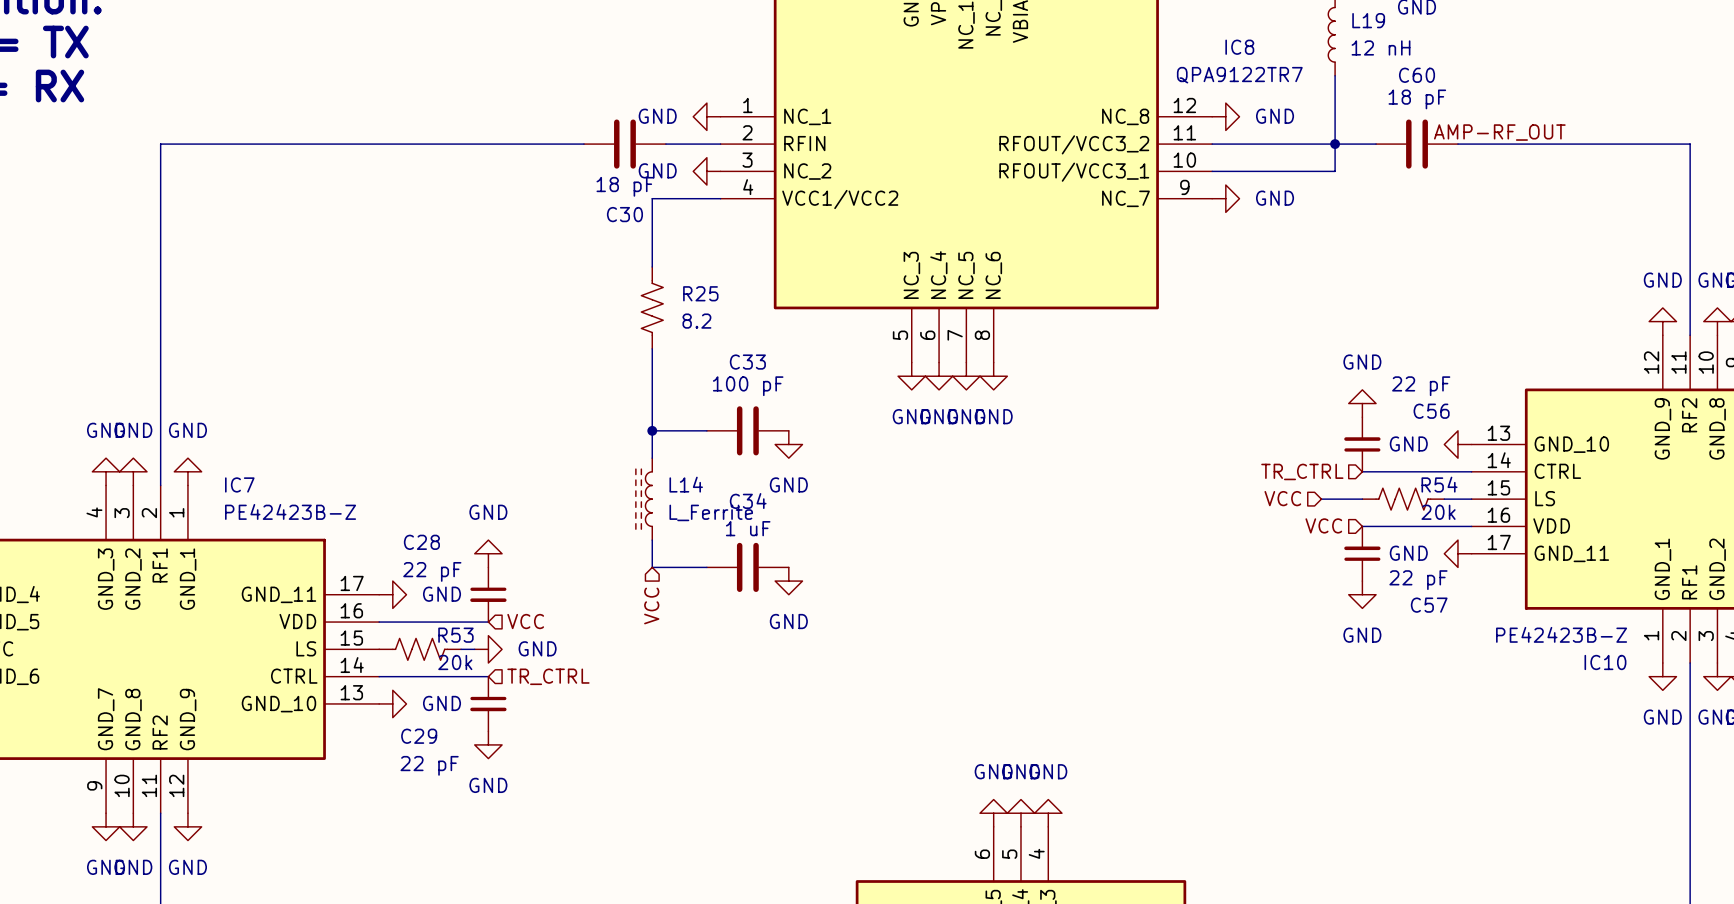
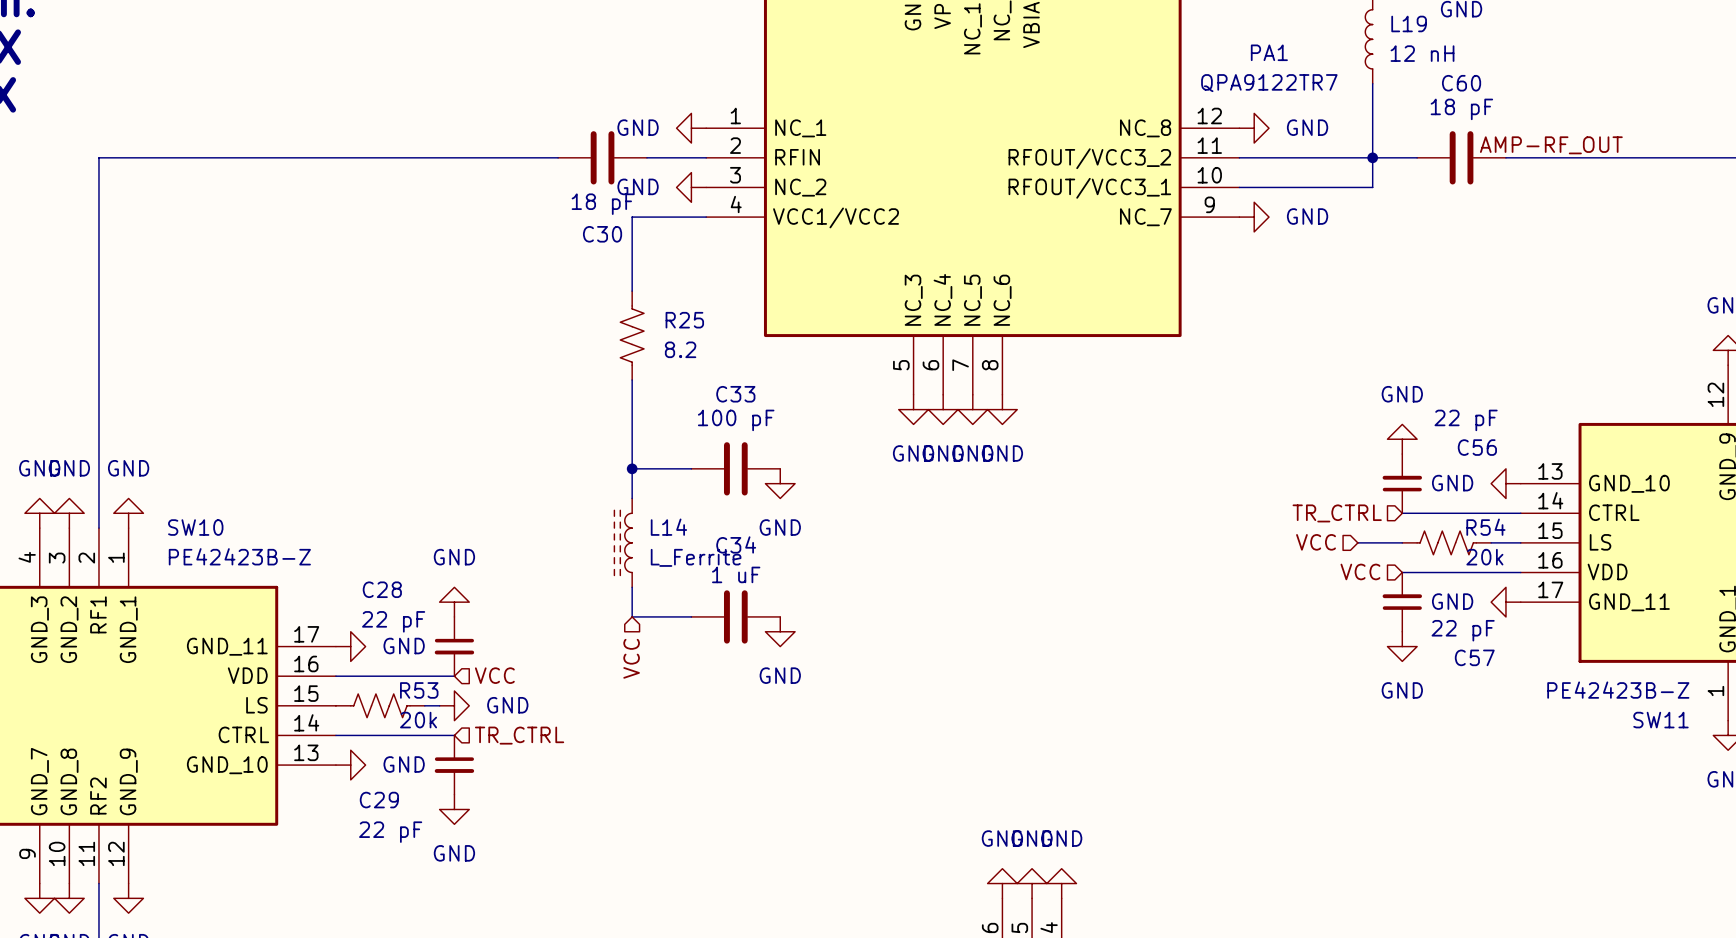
IC8 name: IC8 (1239, 47) -> PA1 (1269, 52)
IC7 name: IC7 (239, 484) -> SW10 (195, 527)
IC10 name: IC10 (1605, 662) -> SW11 (1660, 720)

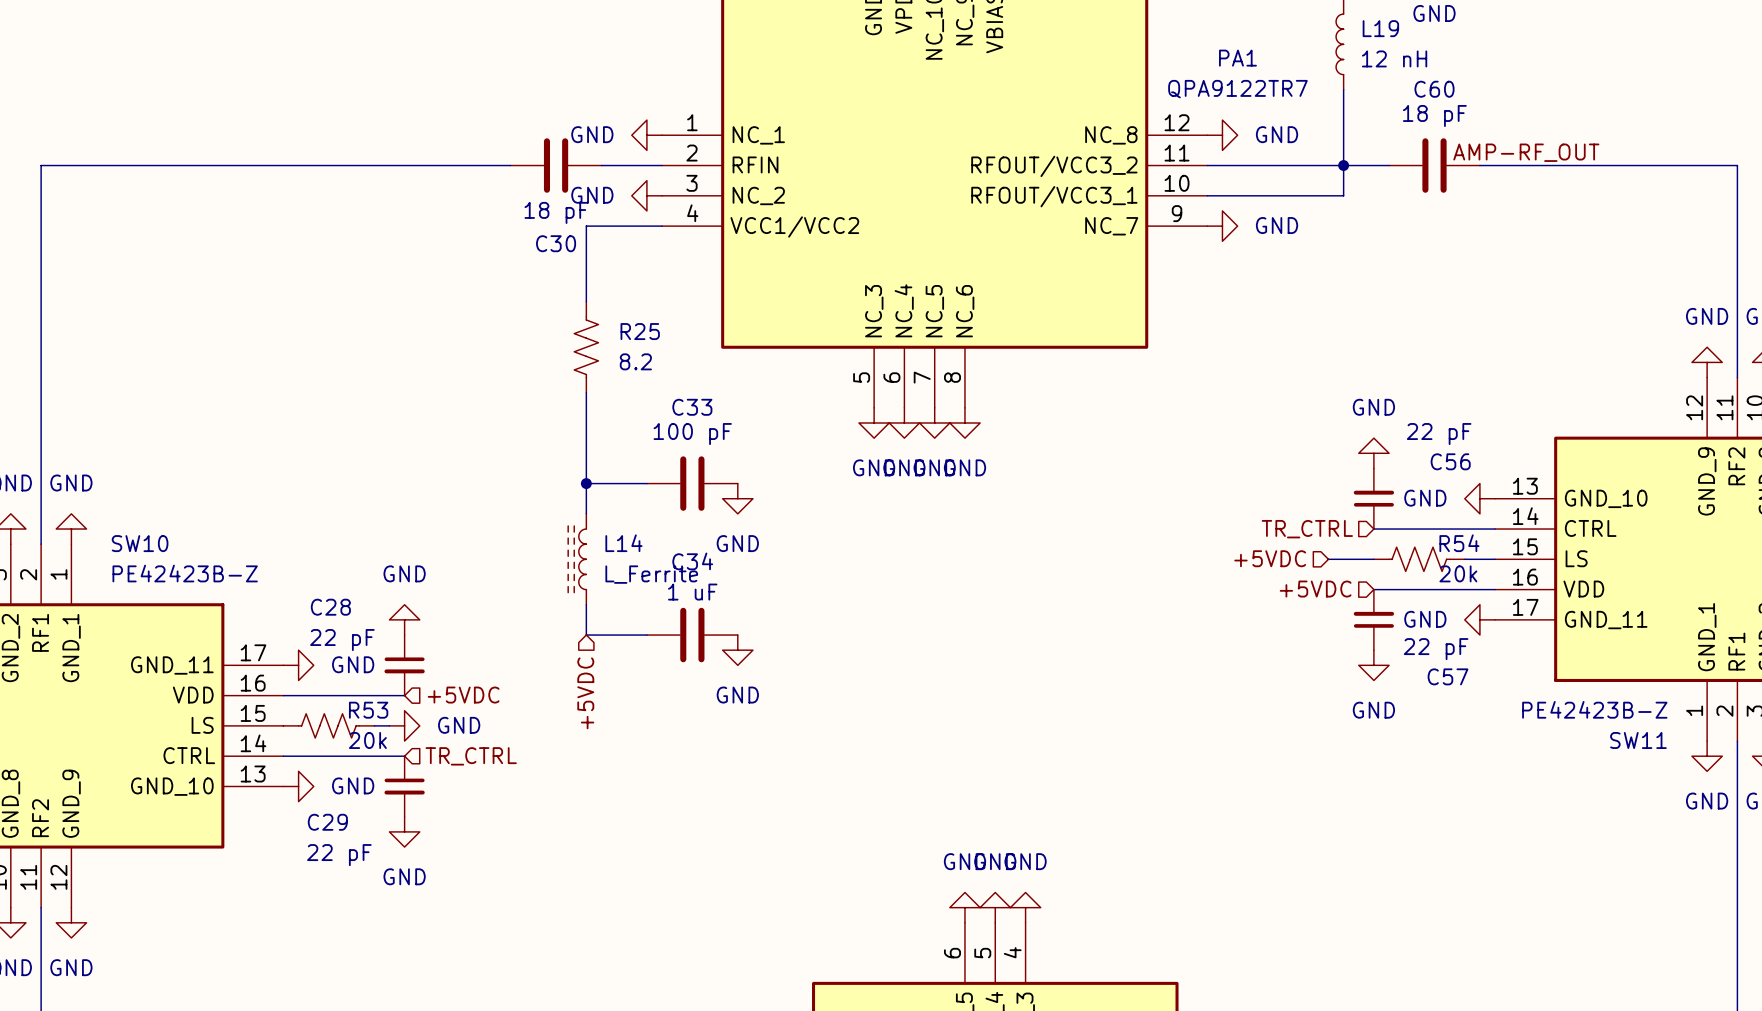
hierarchical label: VCC (1316, 542) -> +5VDC (1270, 558)
hierarchical label: VCC (1360, 571) -> +5VDC (1315, 589)
hierarchical label: VCC (631, 658) -> +5VDC (585, 693)
hierarchical label: VCC (494, 675) -> +5VDC (463, 695)

